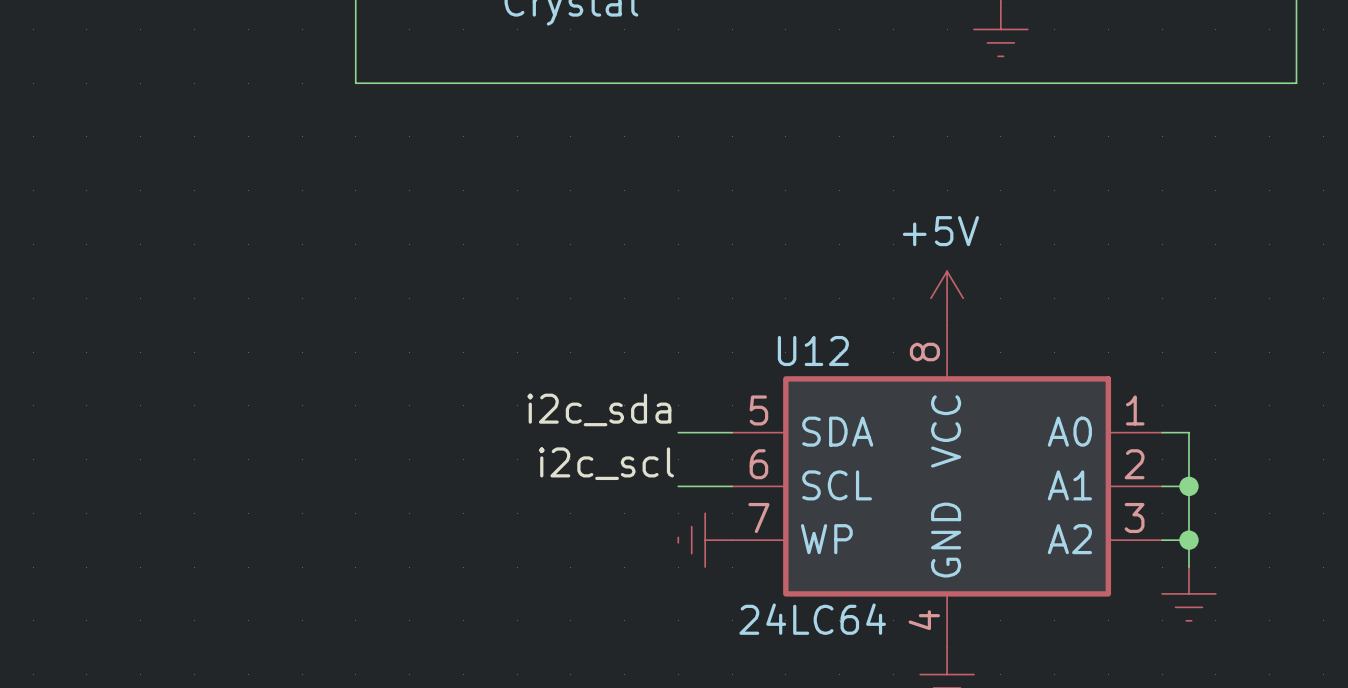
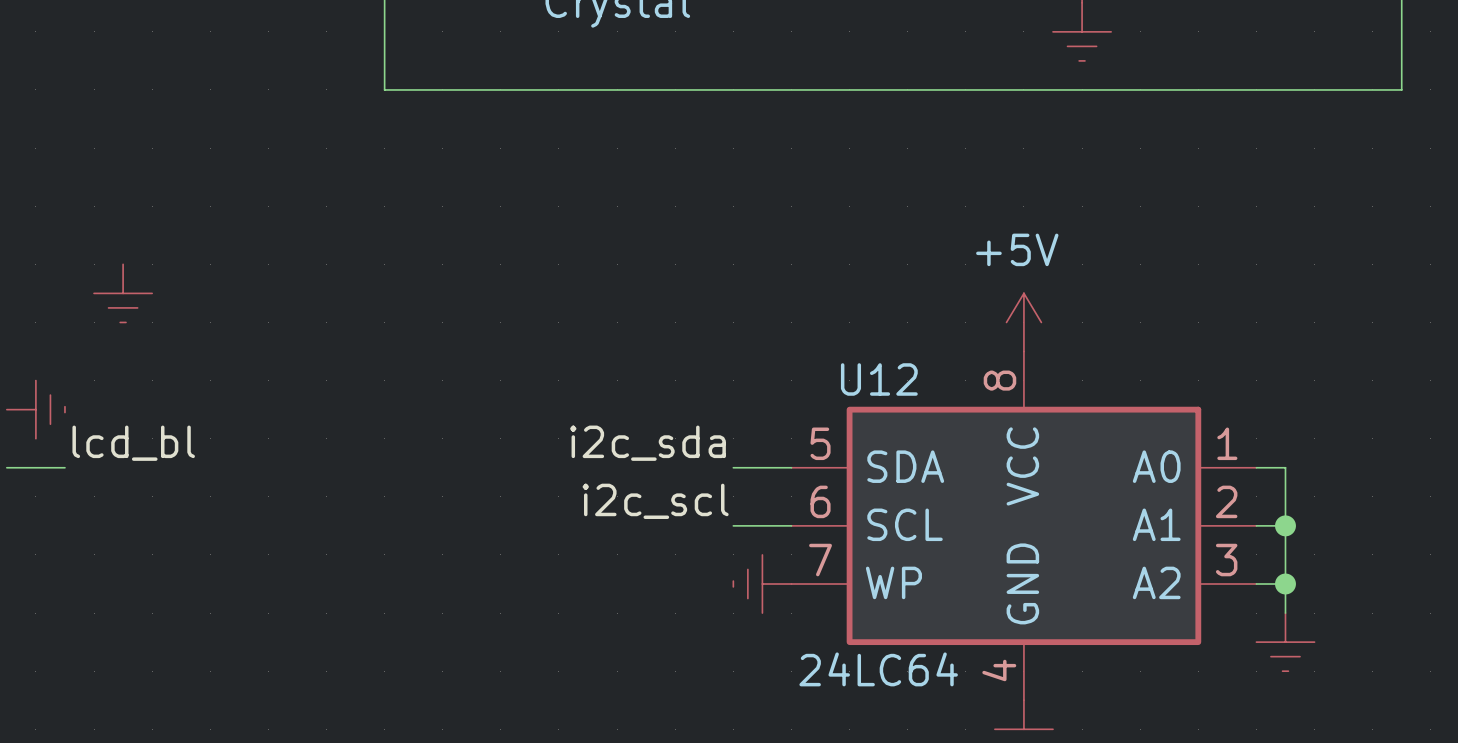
power symbol: none -> (123, 293)
power symbol: none -> (35, 409)
label: none -> lcd_bl (133, 443)
wire: none -> (6, 467) (64, 467)

